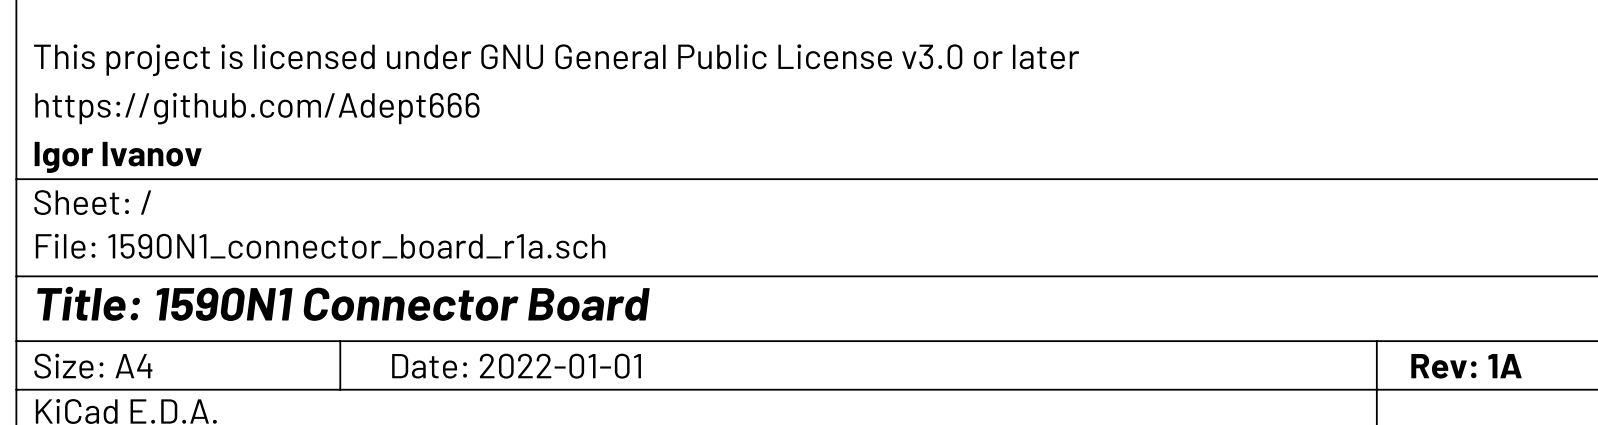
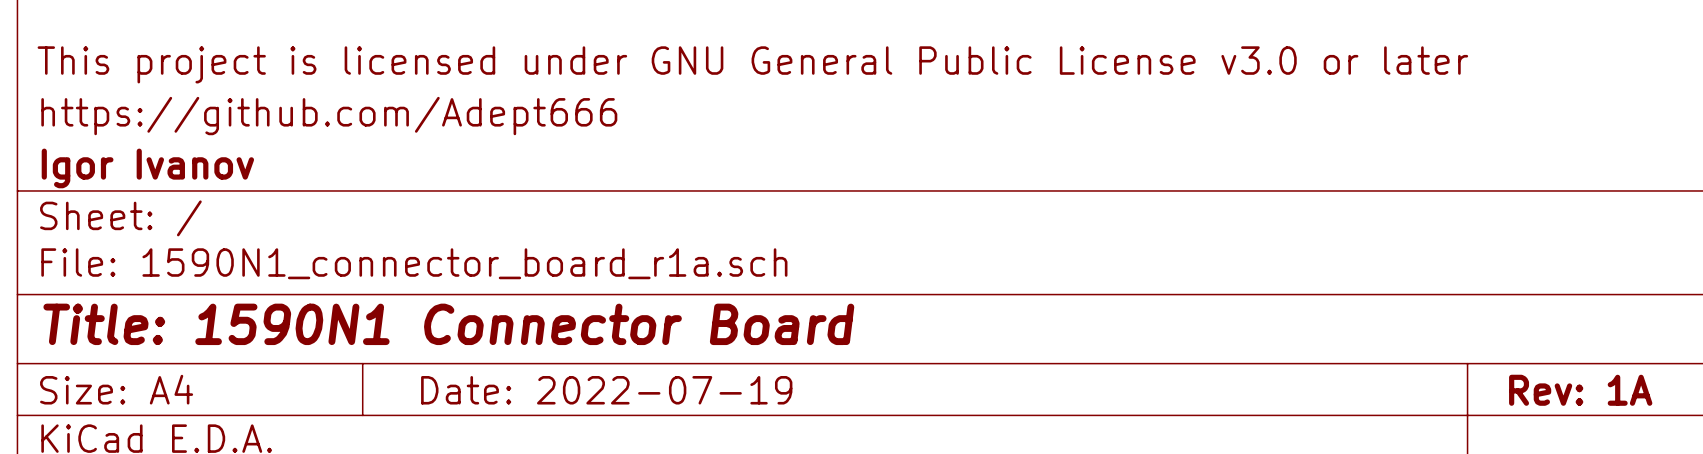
title block: Date: 2022-01-01 (516, 366) -> Date: 2022-07-19 (606, 390)

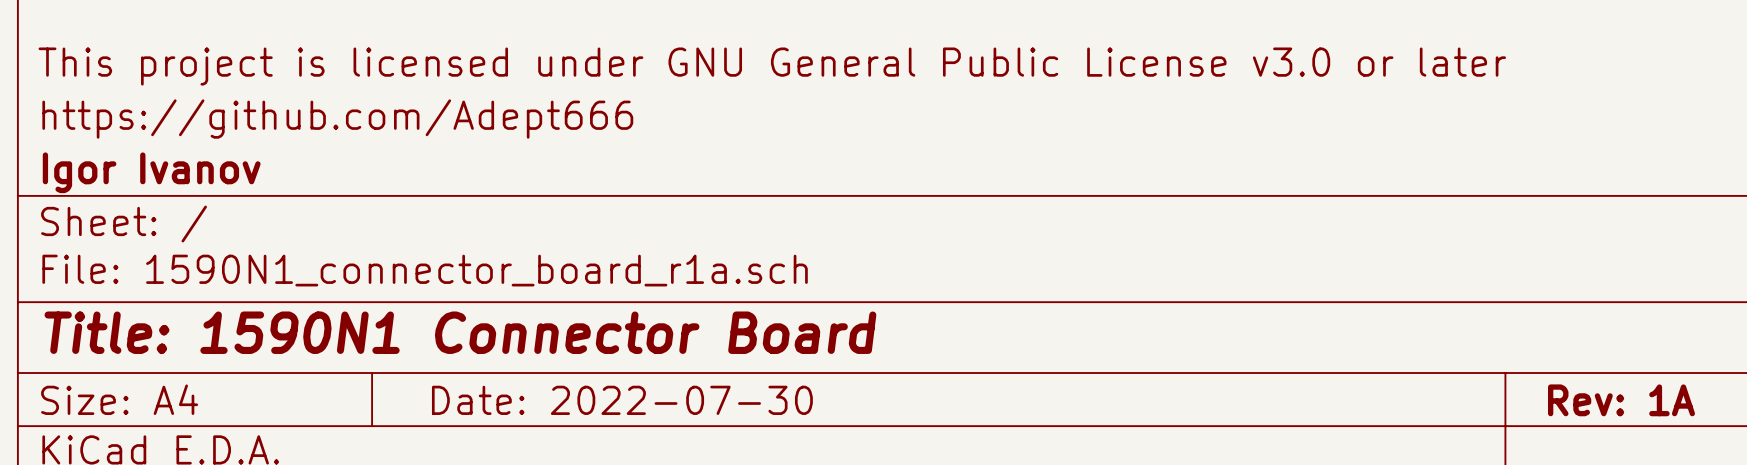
title block: Date: 2022-07-19 (606, 390) -> Date: 2022-07-30 (622, 400)

